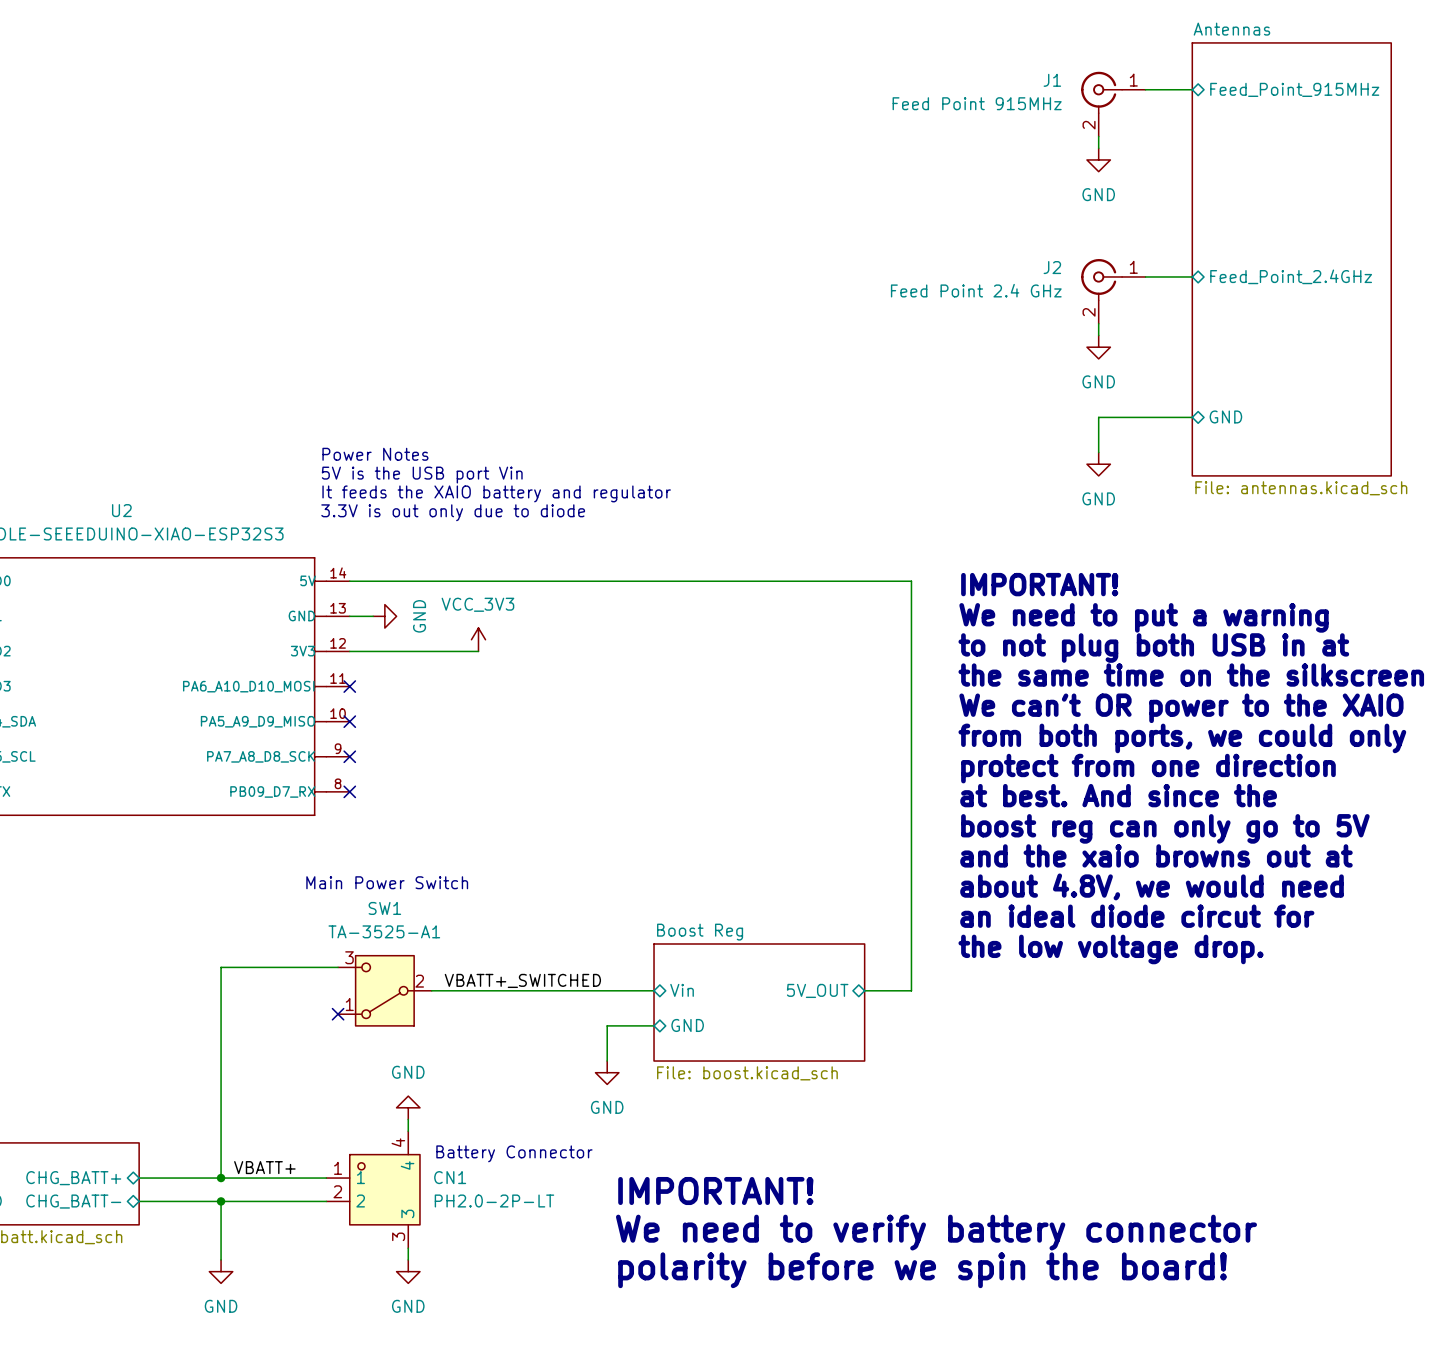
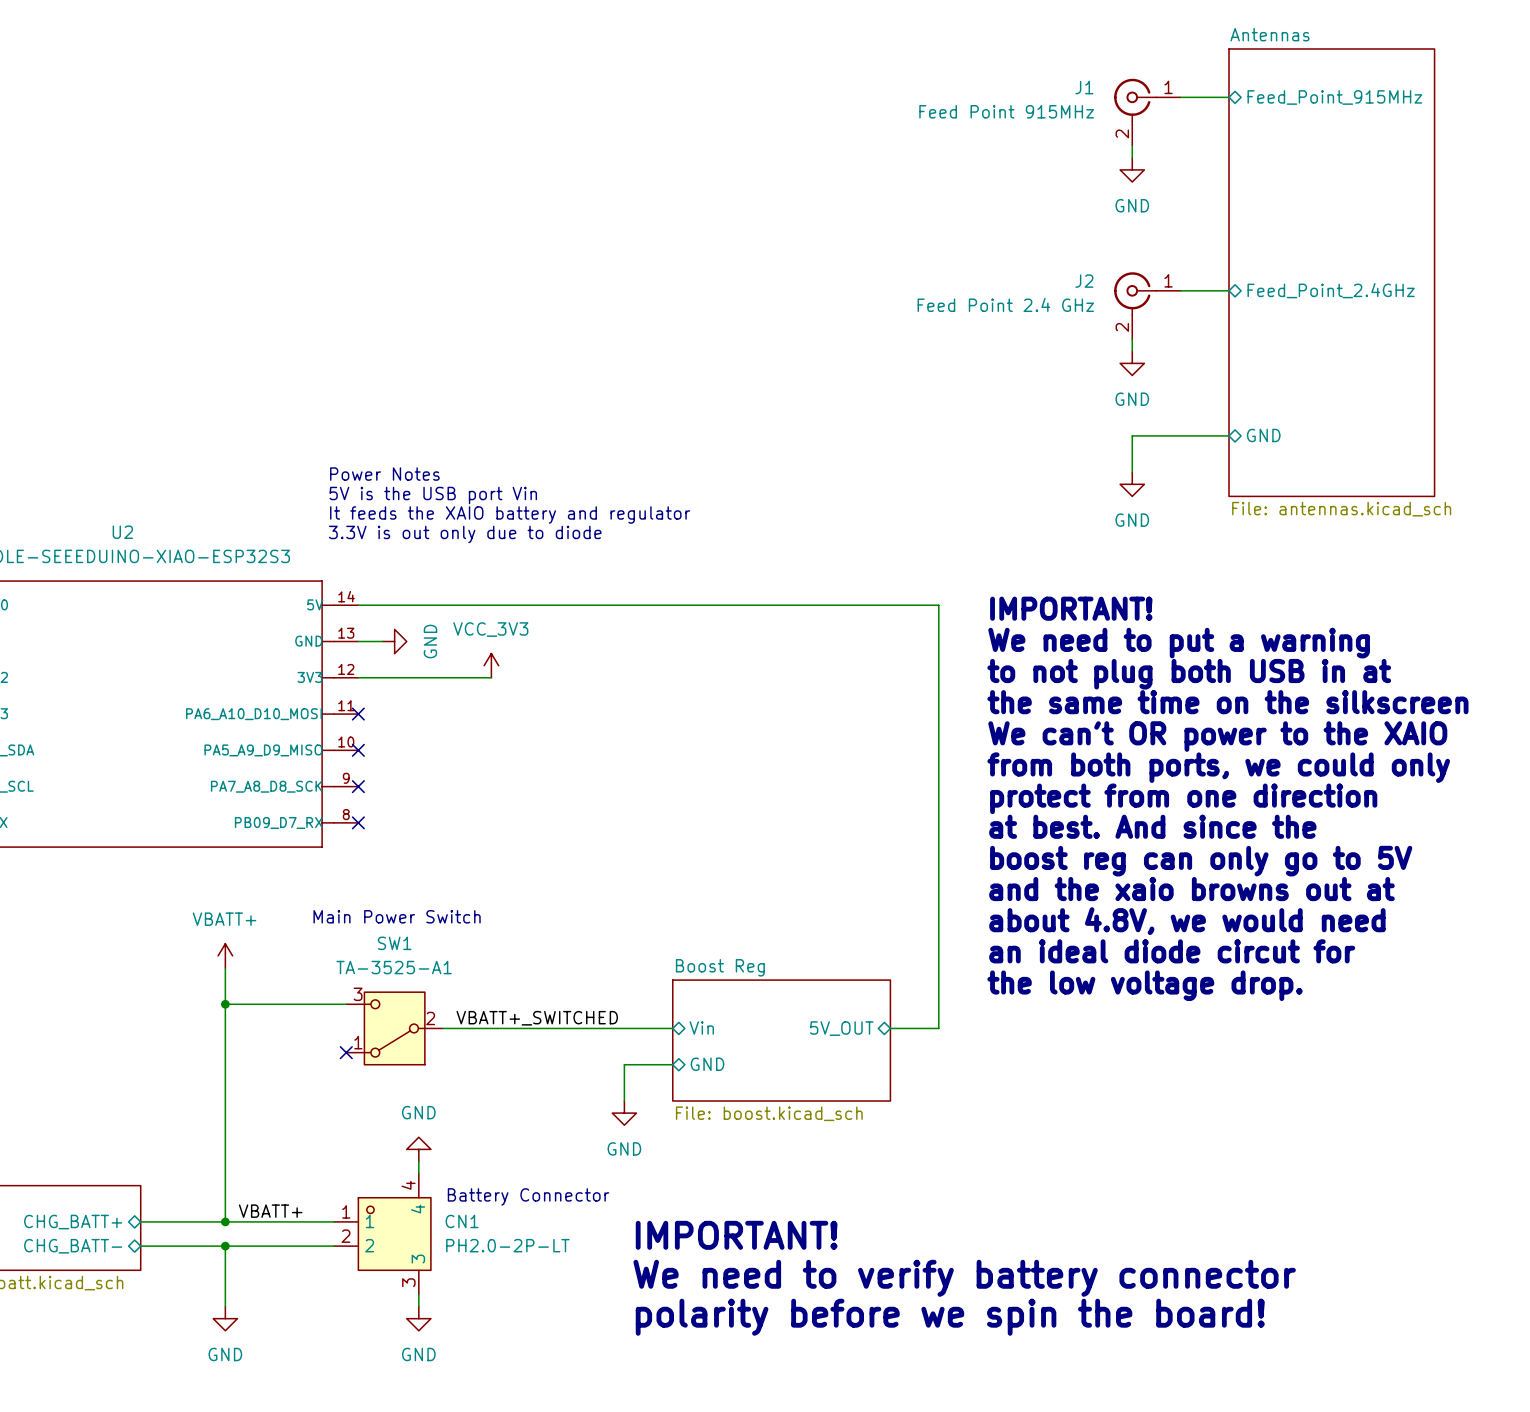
power symbol: none -> VBATT+ (225, 955)
wire: none -> (225, 967) (225, 1004)
junction: none -> (225, 1004)

